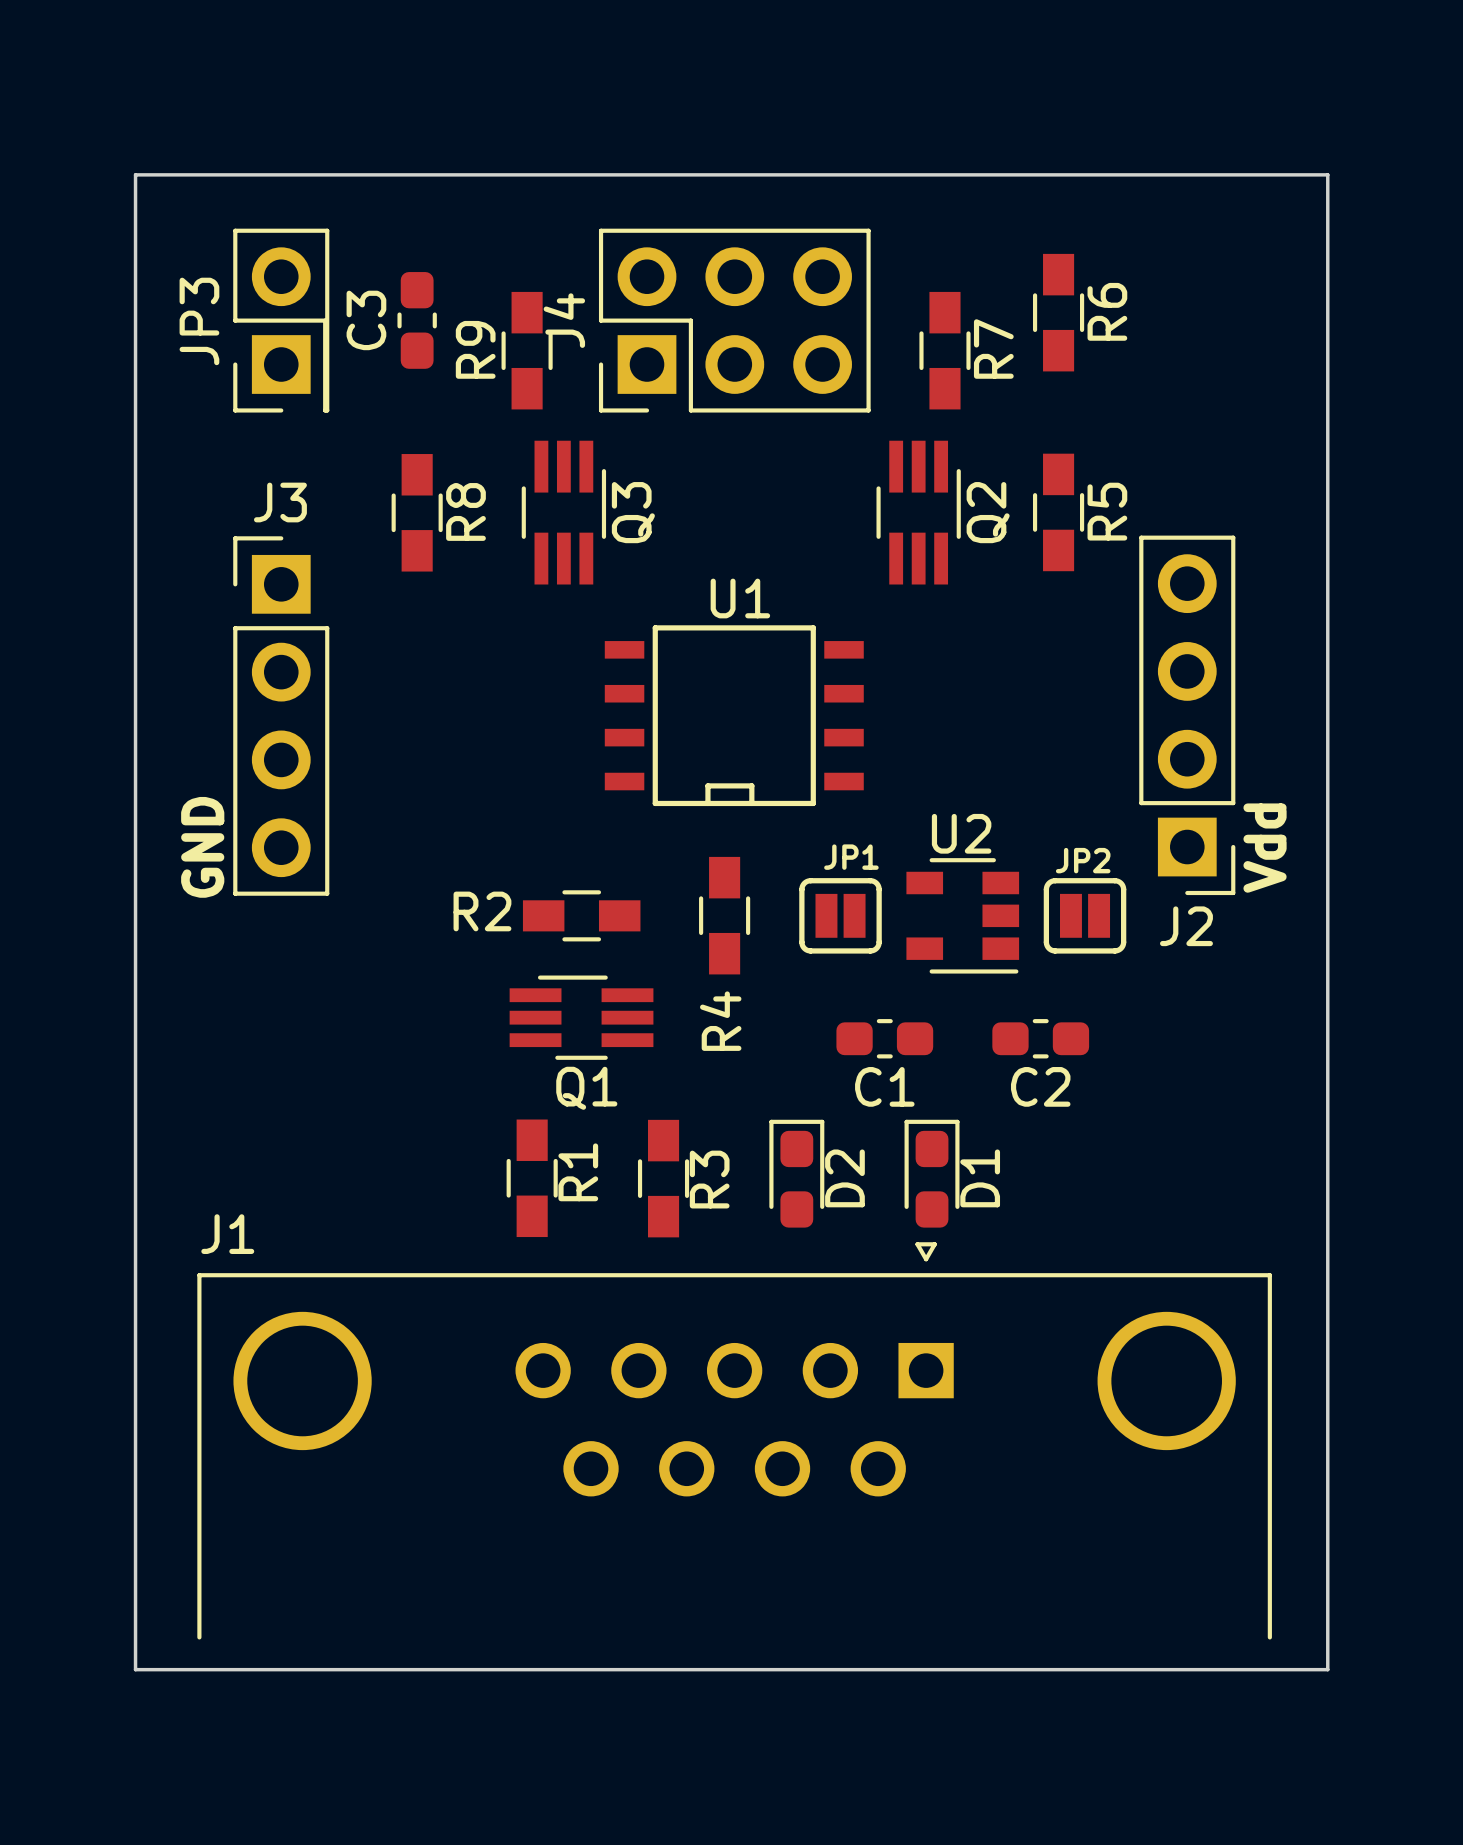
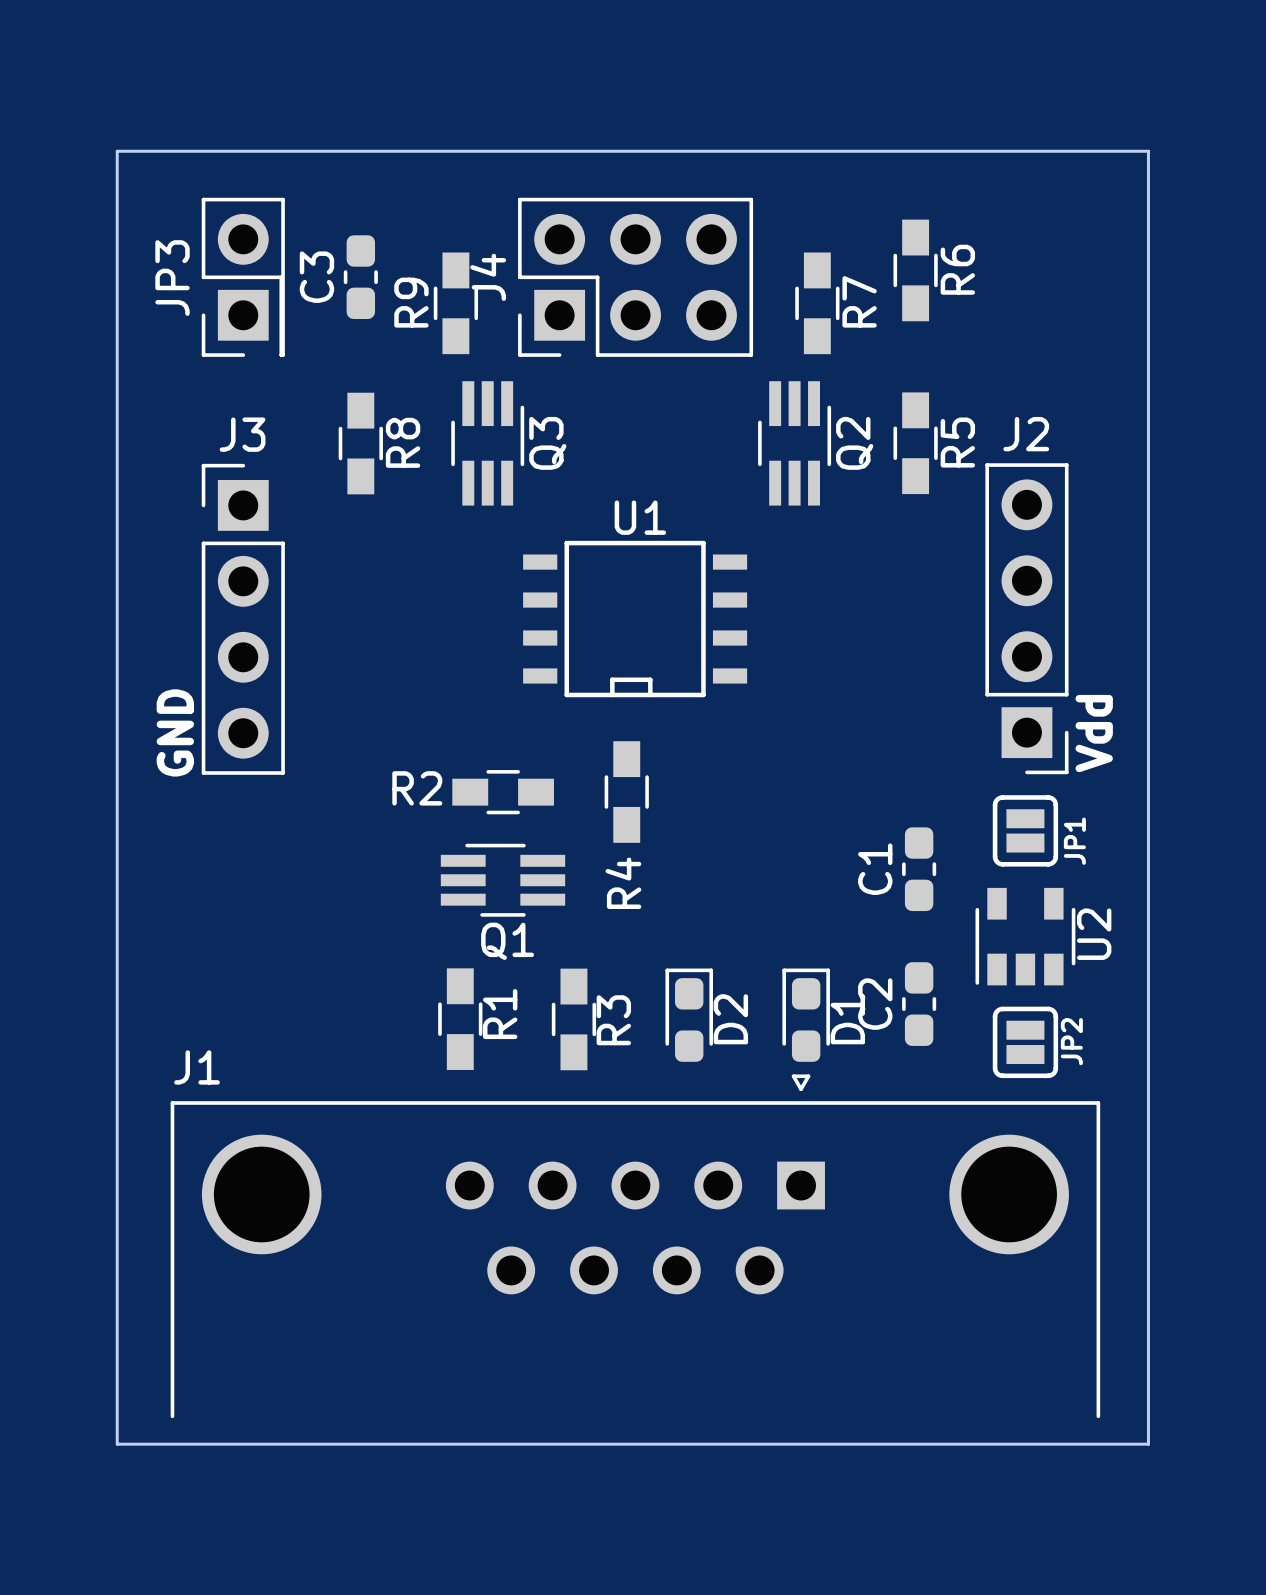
JP1 rotation: 0° (840, 915) -> 90° clockwise (1025, 830)
JP1 position: (840, 915) -> (1025, 830)
U2 rotation: 0° (962, 915) -> 90° clockwise (1025, 936)
U2 position: (962, 915) -> (1025, 936)
JP2 rotation: 0° (1085, 915) -> 90° clockwise (1025, 1042)
JP2 position: (1085, 915) -> (1025, 1042)
J2 name position: J2 (1186, 926) -> J2 (1026, 434)
C1 rotation: 0° (884, 1038) -> 90° clockwise (919, 869)
C1 position: (884, 1038) -> (919, 869)
C2 rotation: 0° (1040, 1038) -> 90° clockwise (919, 1004)
C2 position: (1040, 1038) -> (919, 1004)

